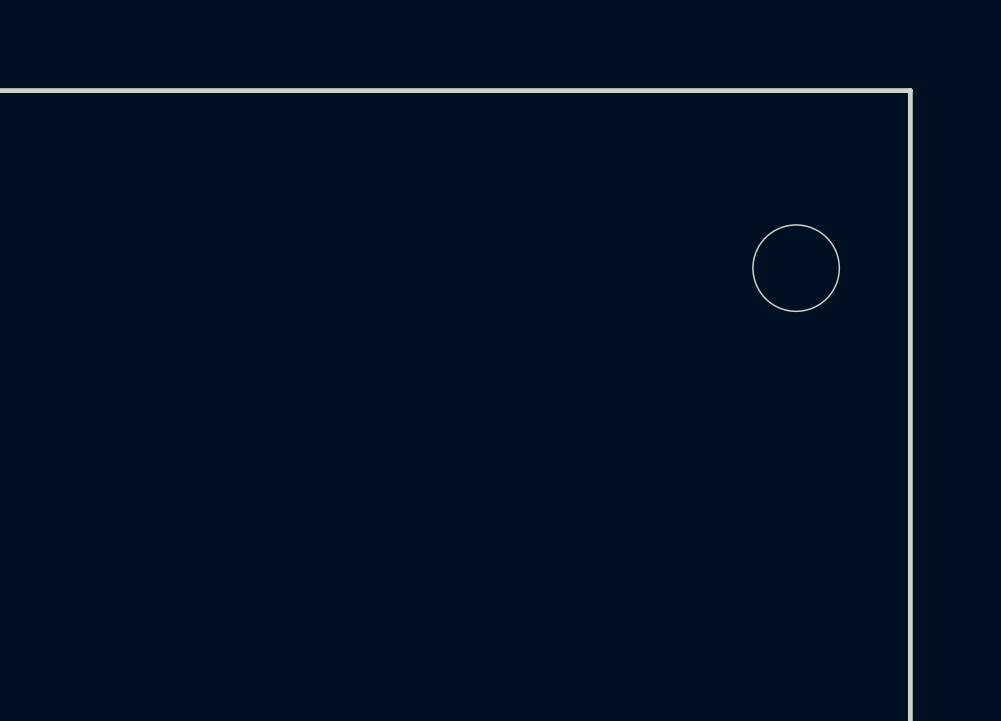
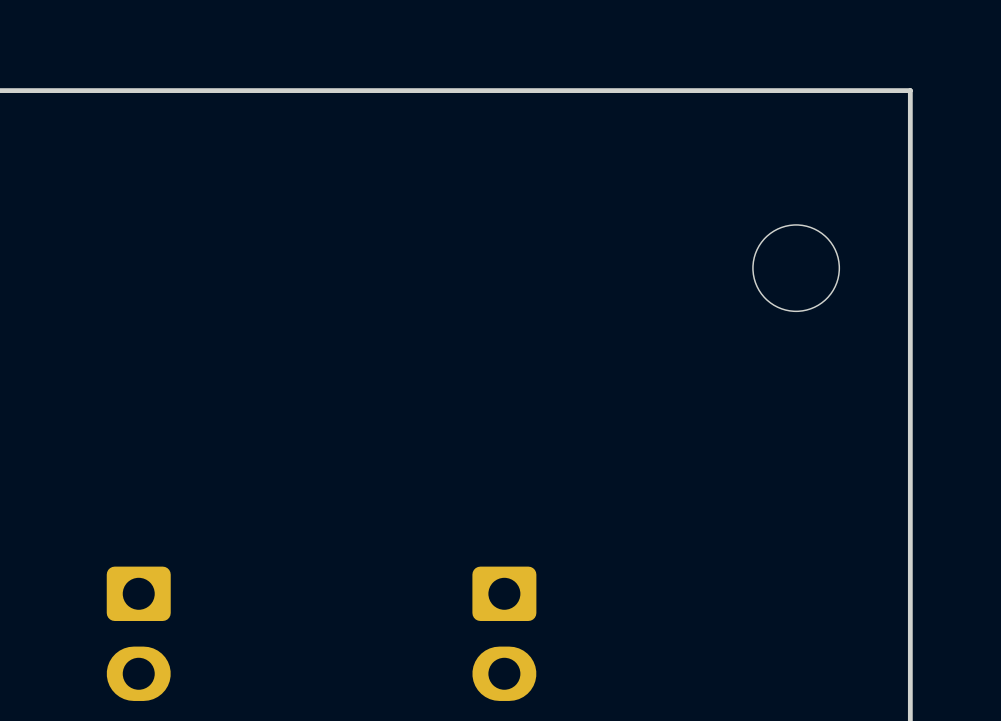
part: none -> (138, 633)
part: none -> (504, 633)

